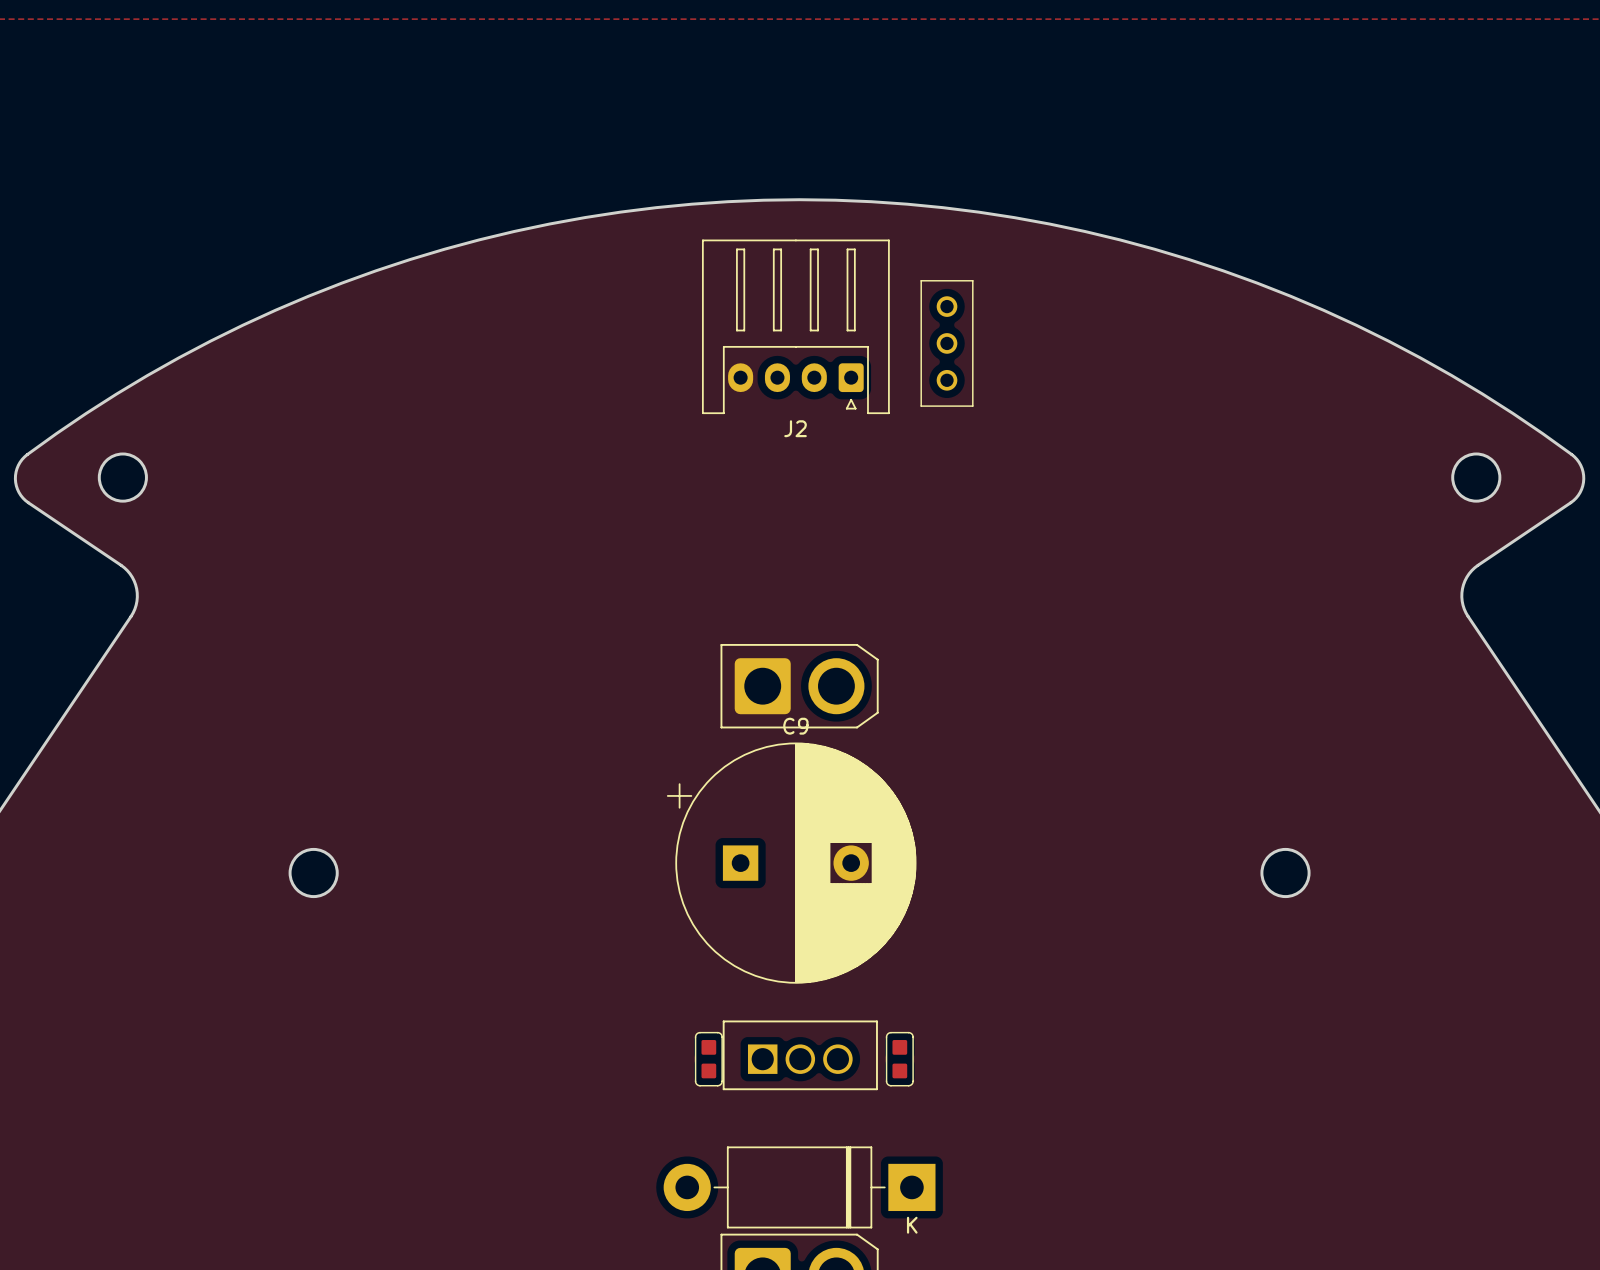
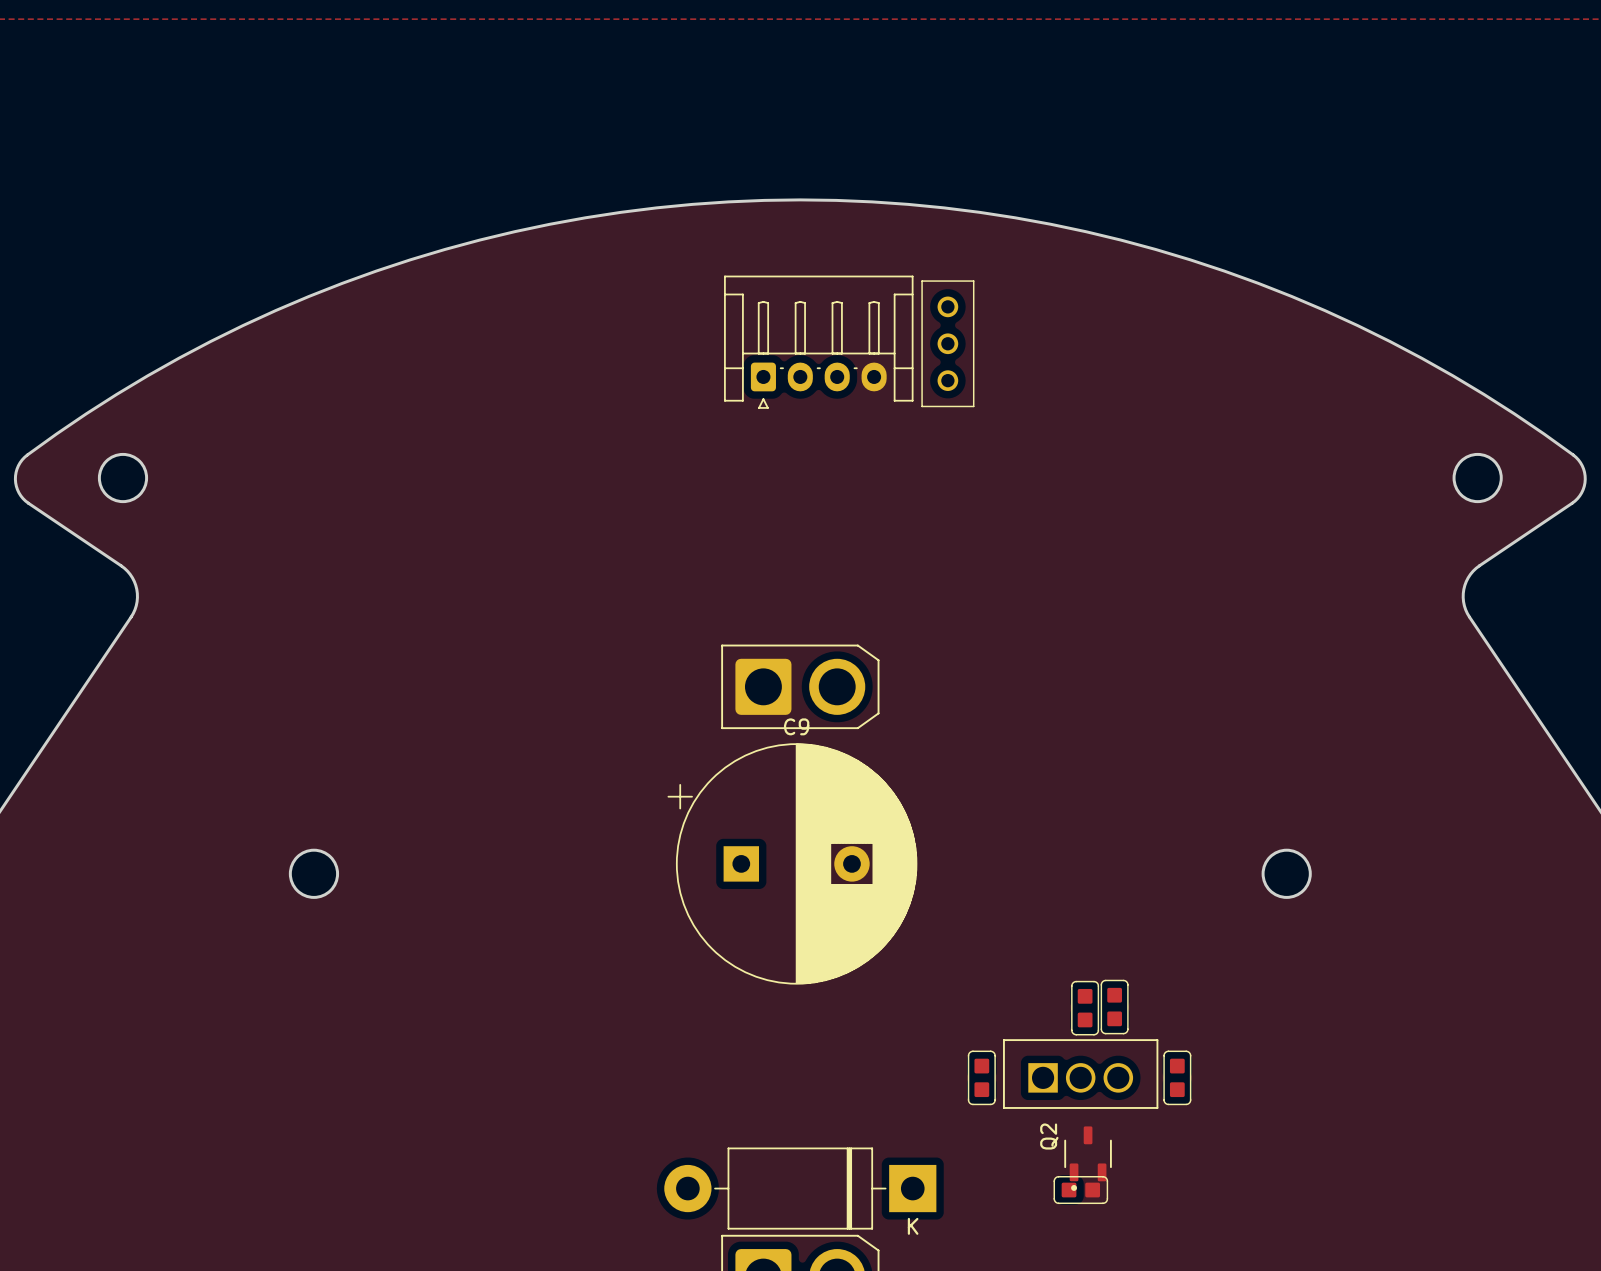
J2: (795, 326) -> none
part: none -> (818, 342)
part: none -> (1114, 1007)
part: none -> (1085, 1008)
part position: (800, 1055) -> (1080, 1074)
part: (708, 1059) -> none
part position: (899, 1059) -> (981, 1077)
part: none -> (1177, 1077)
Q2: none -> (1088, 1158)
part: none -> (1080, 1190)

